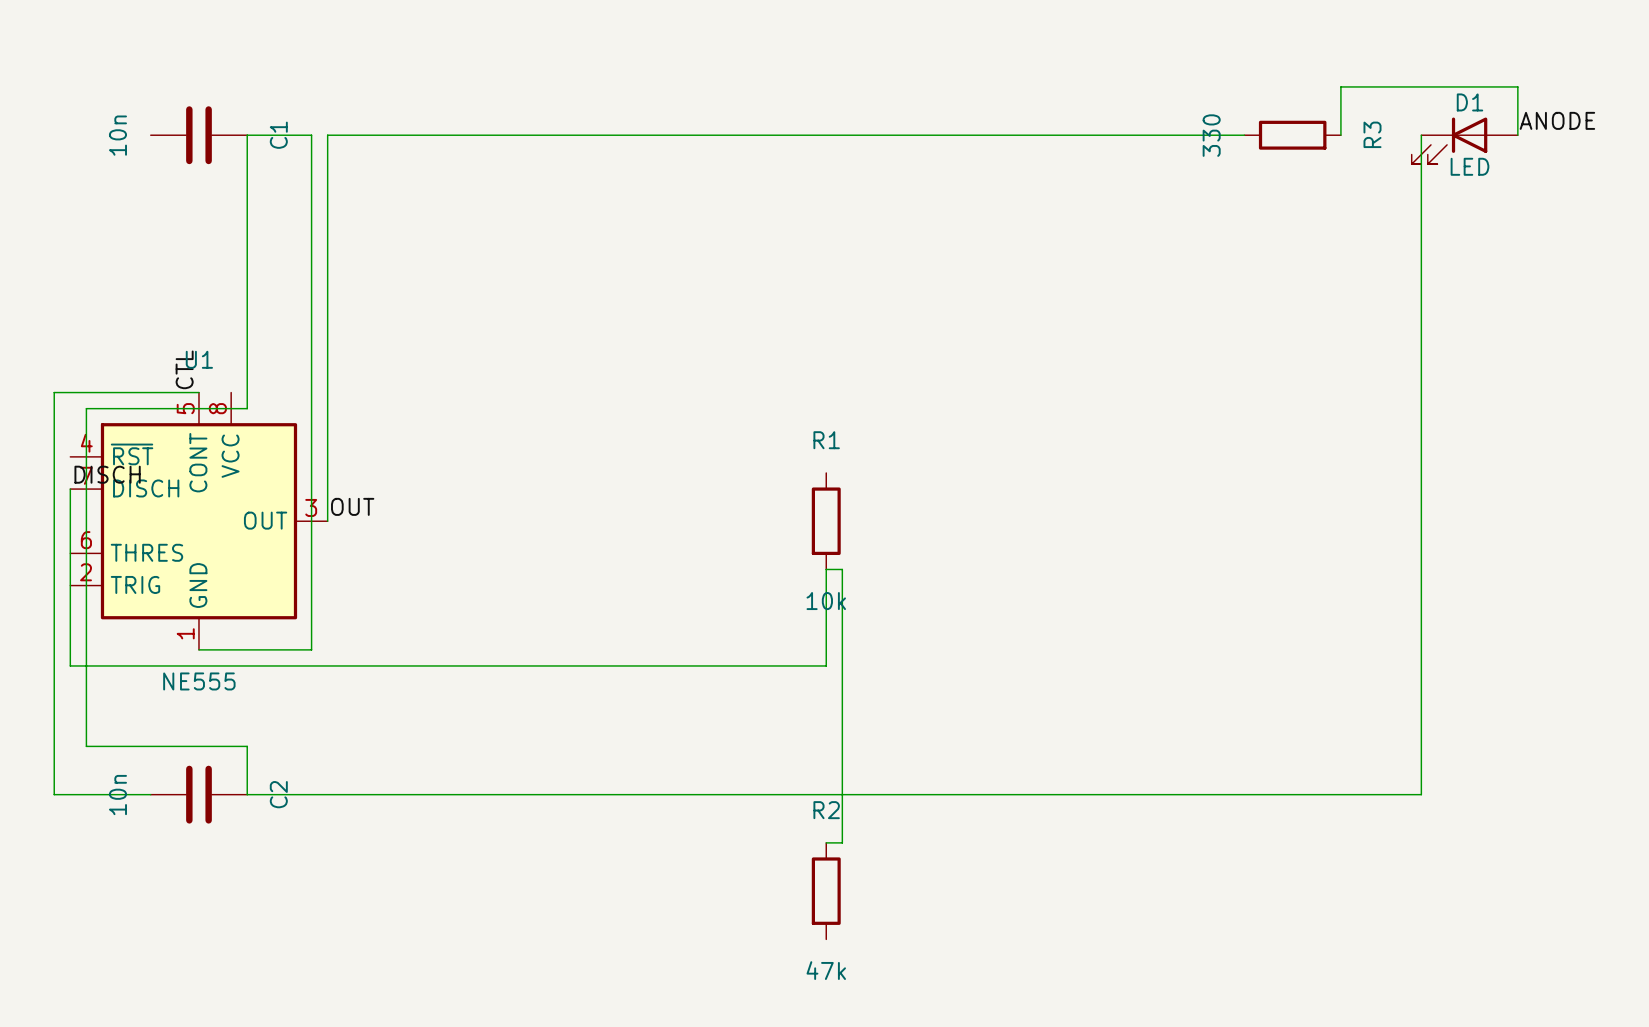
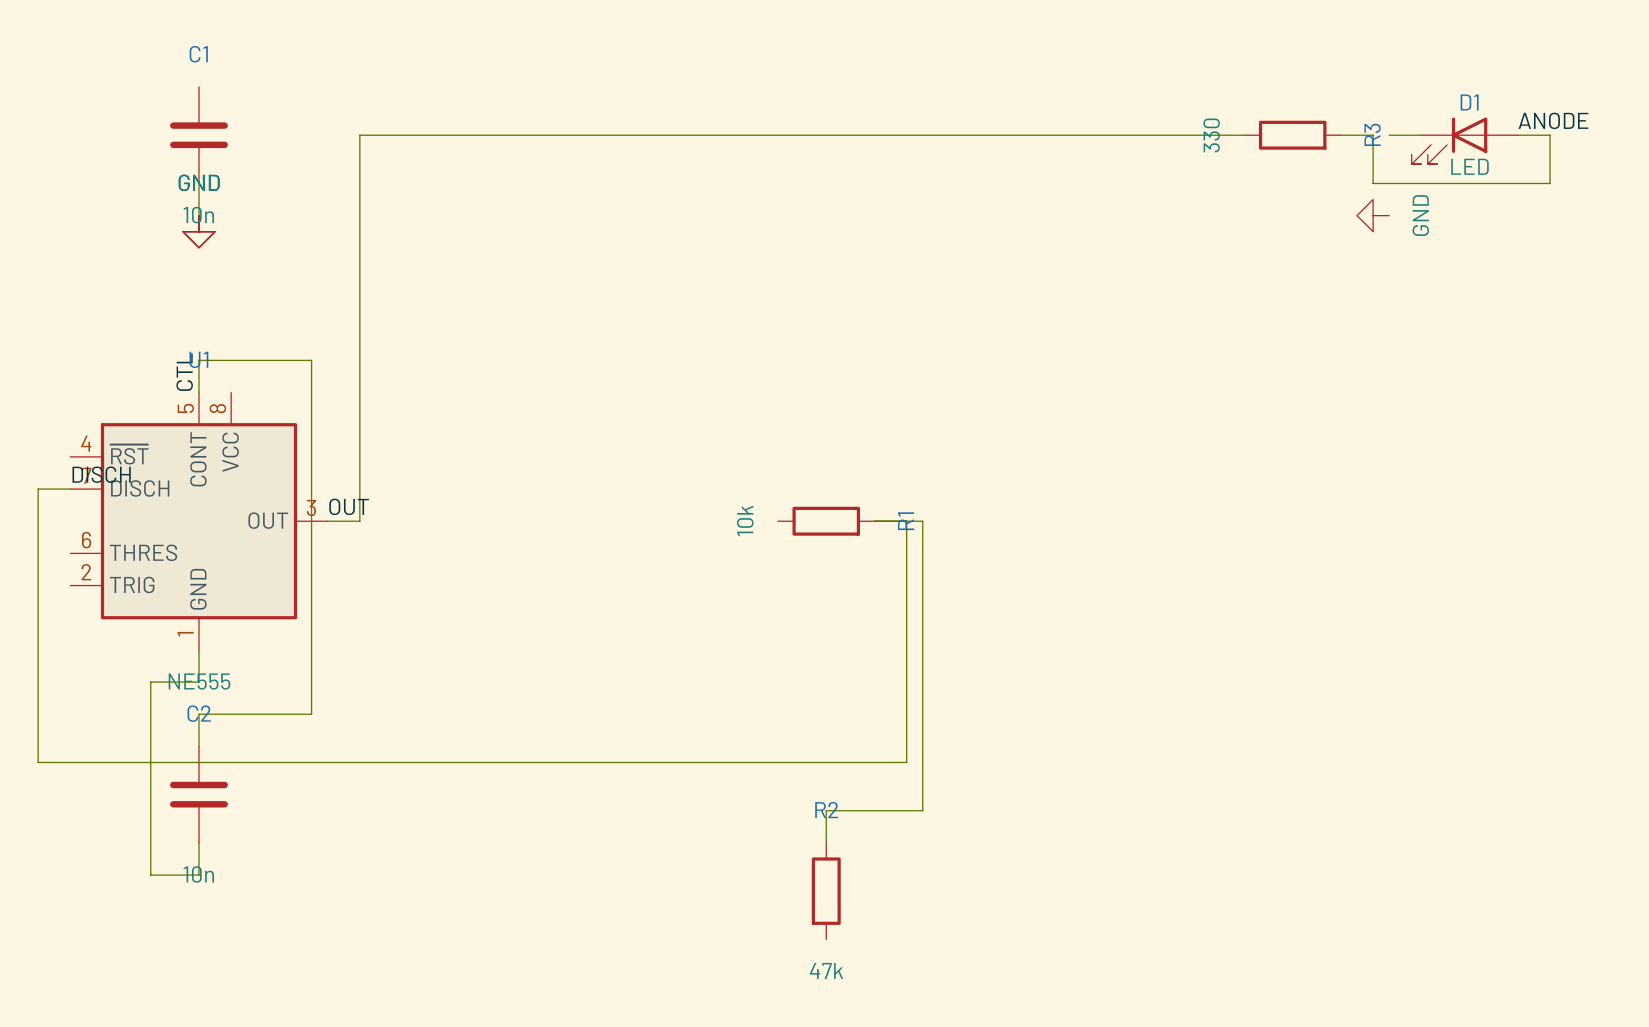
C1 value position: 10n (117, 135) -> 10n (198, 215)
C1 rotation: 0° (198, 135) -> 90° clockwise (198, 135)
C1 name position: C1 (278, 135) -> C1 (198, 54)
wire: (359, 135) (327, 135) (327, 521) -> (359, 135) (359, 521) (327, 521)
wire: (1340, 135) (1340, 86) (1517, 86) (1517, 135) -> (1340, 135) (1373, 135) (1373, 183) (1550, 183) (1550, 135) (1517, 135)
wire: (1421, 135) (1421, 794) (247, 794) (247, 746) (86, 746) (86, 408) (247, 408) (247, 135) (311, 135) (311, 360) -> (1421, 135) (1389, 135)
wire: none -> (198, 183) (198, 215)
power symbol: none -> GND (1373, 215)
power symbol: none -> GND (198, 231)
wire: (198, 392) (54, 392) (54, 794) (150, 794) -> (198, 392) (198, 360) (311, 360)
wire: (70, 489) (70, 665) (826, 665) (826, 569) (842, 569) (842, 842) (826, 842) -> (70, 489) (38, 489) (38, 762) (906, 762) (906, 521)
R1 rotation: 0° (826, 521) -> 90° clockwise (826, 521)
wire: none -> (874, 521) (922, 521) (922, 810) (826, 810) (826, 842)
wire: (198, 649) (311, 649) -> (198, 746) (198, 714) (311, 714) (311, 649)
wire: none -> (198, 649) (198, 682) (150, 682) (150, 875) (198, 875) (198, 842)
C2 rotation: 0° (198, 794) -> 90° clockwise (198, 794)
C2 name position: C2 (278, 794) -> C2 (199, 713)
C2 value position: 10n (117, 795) -> 10n (198, 874)

